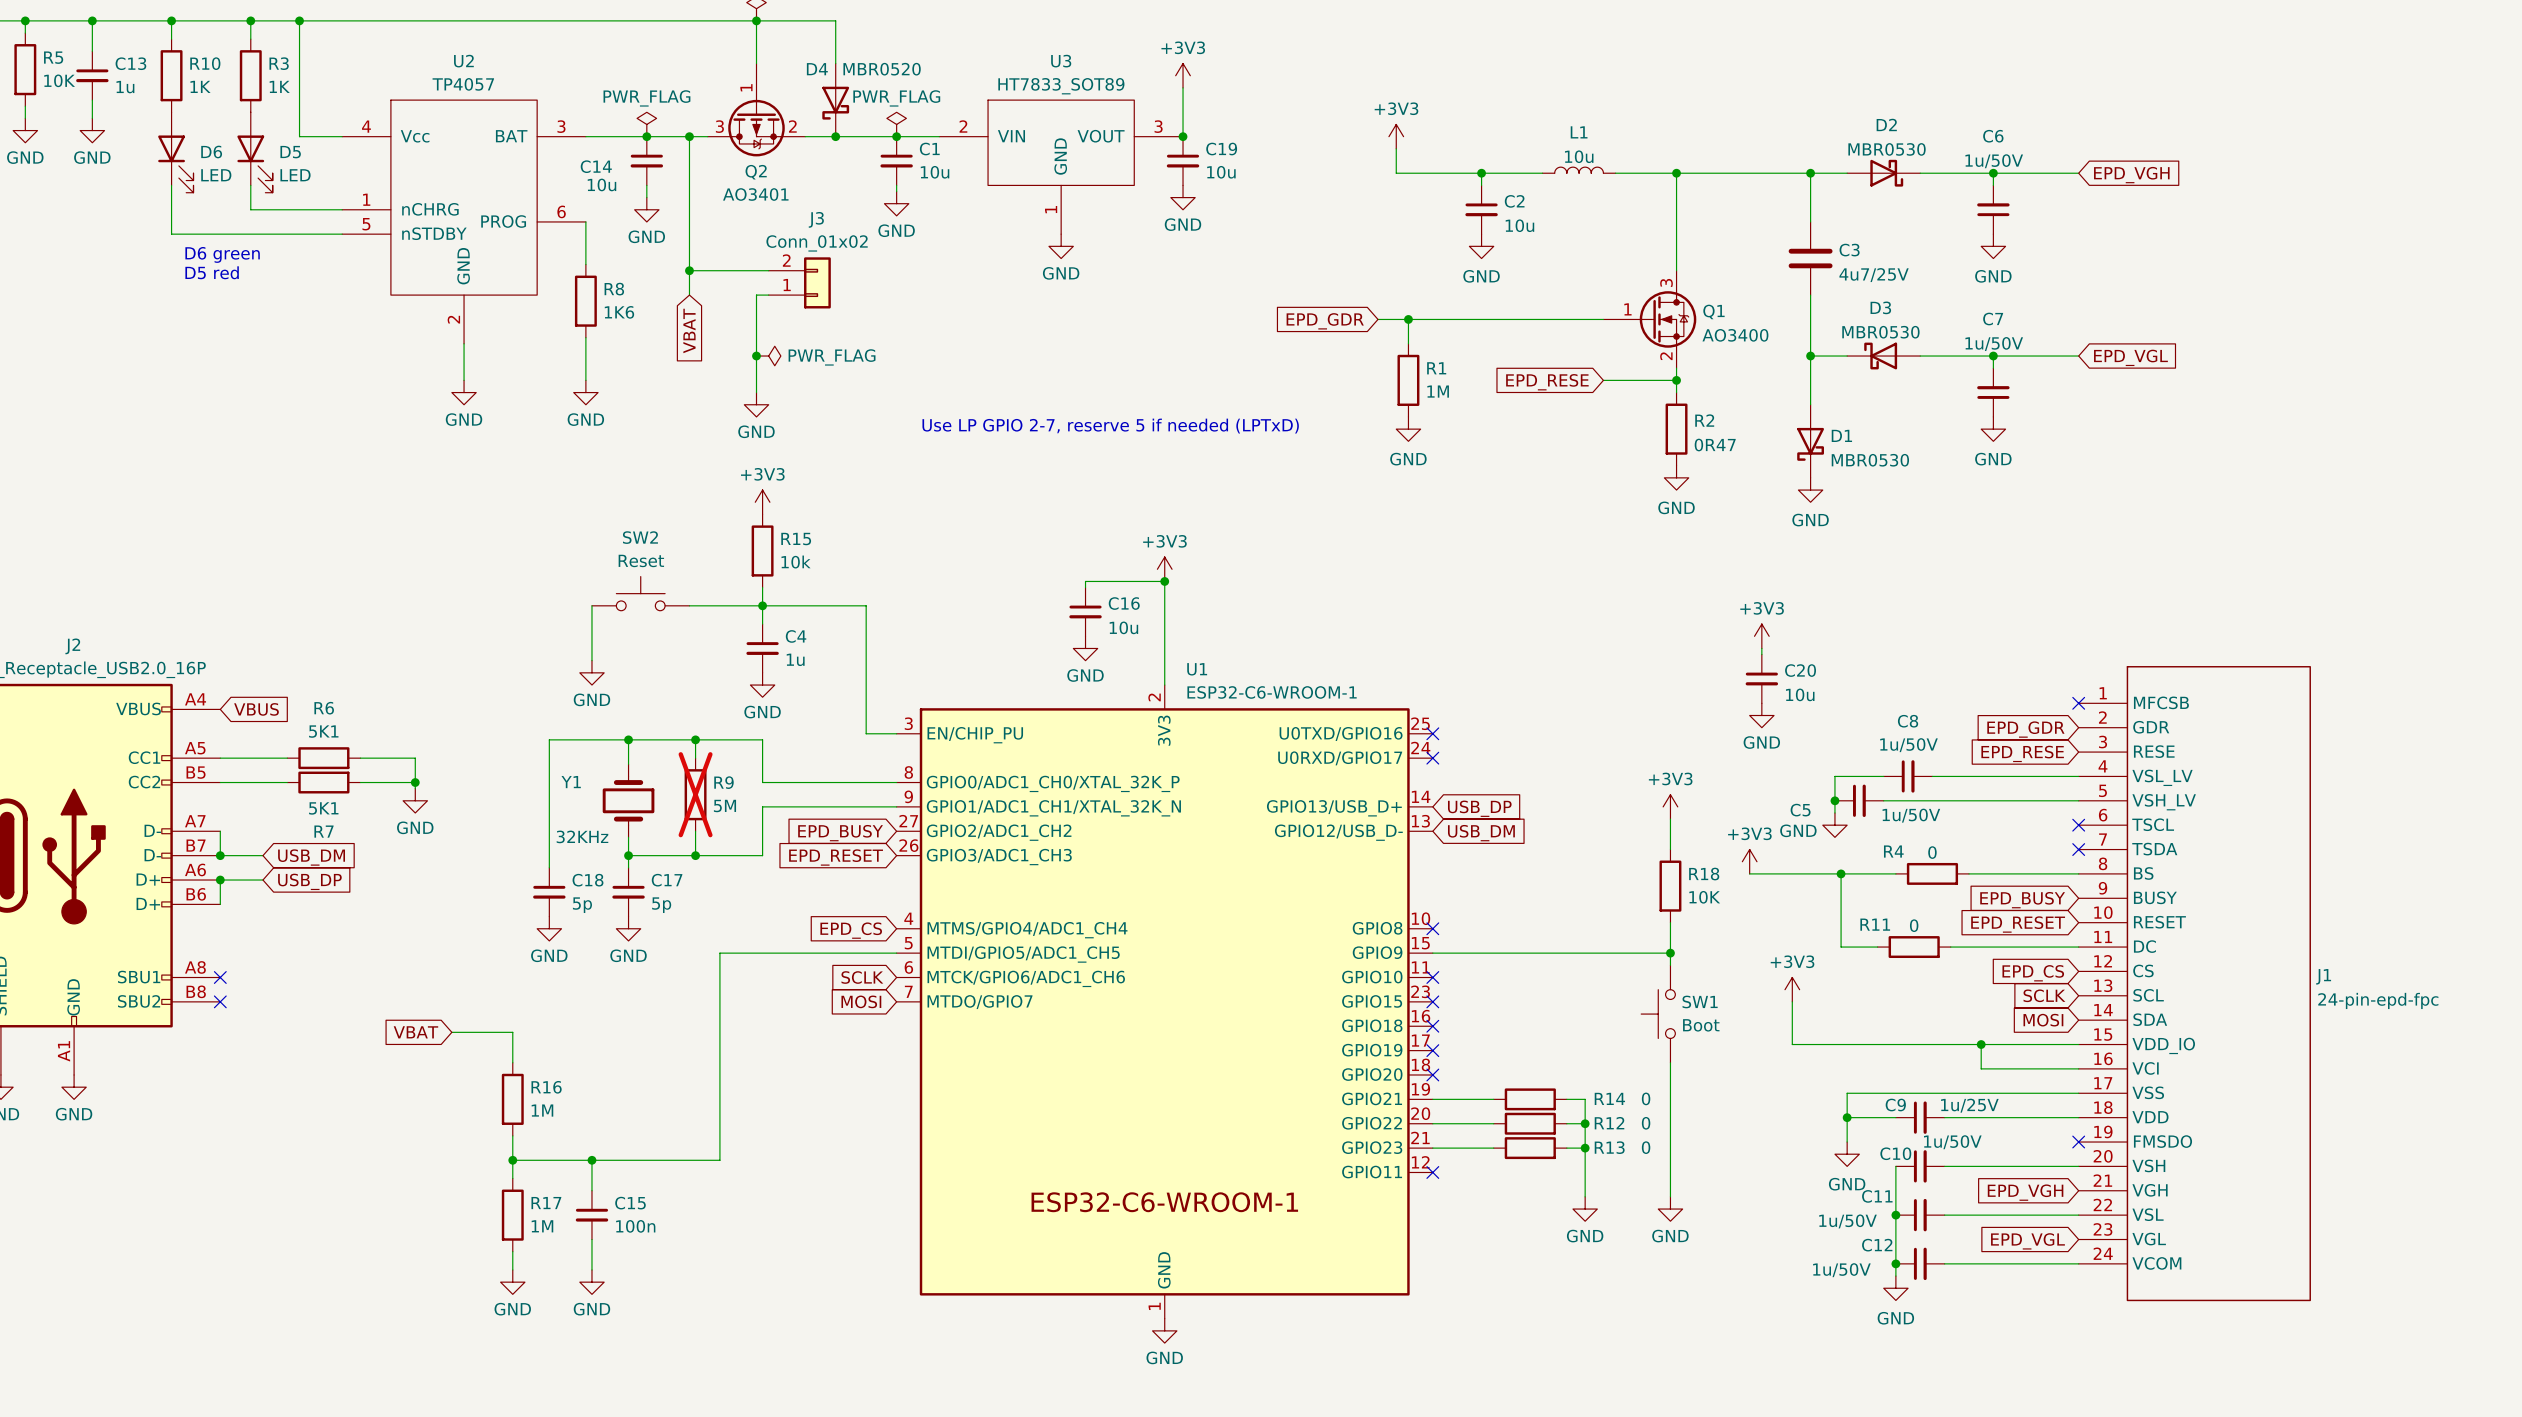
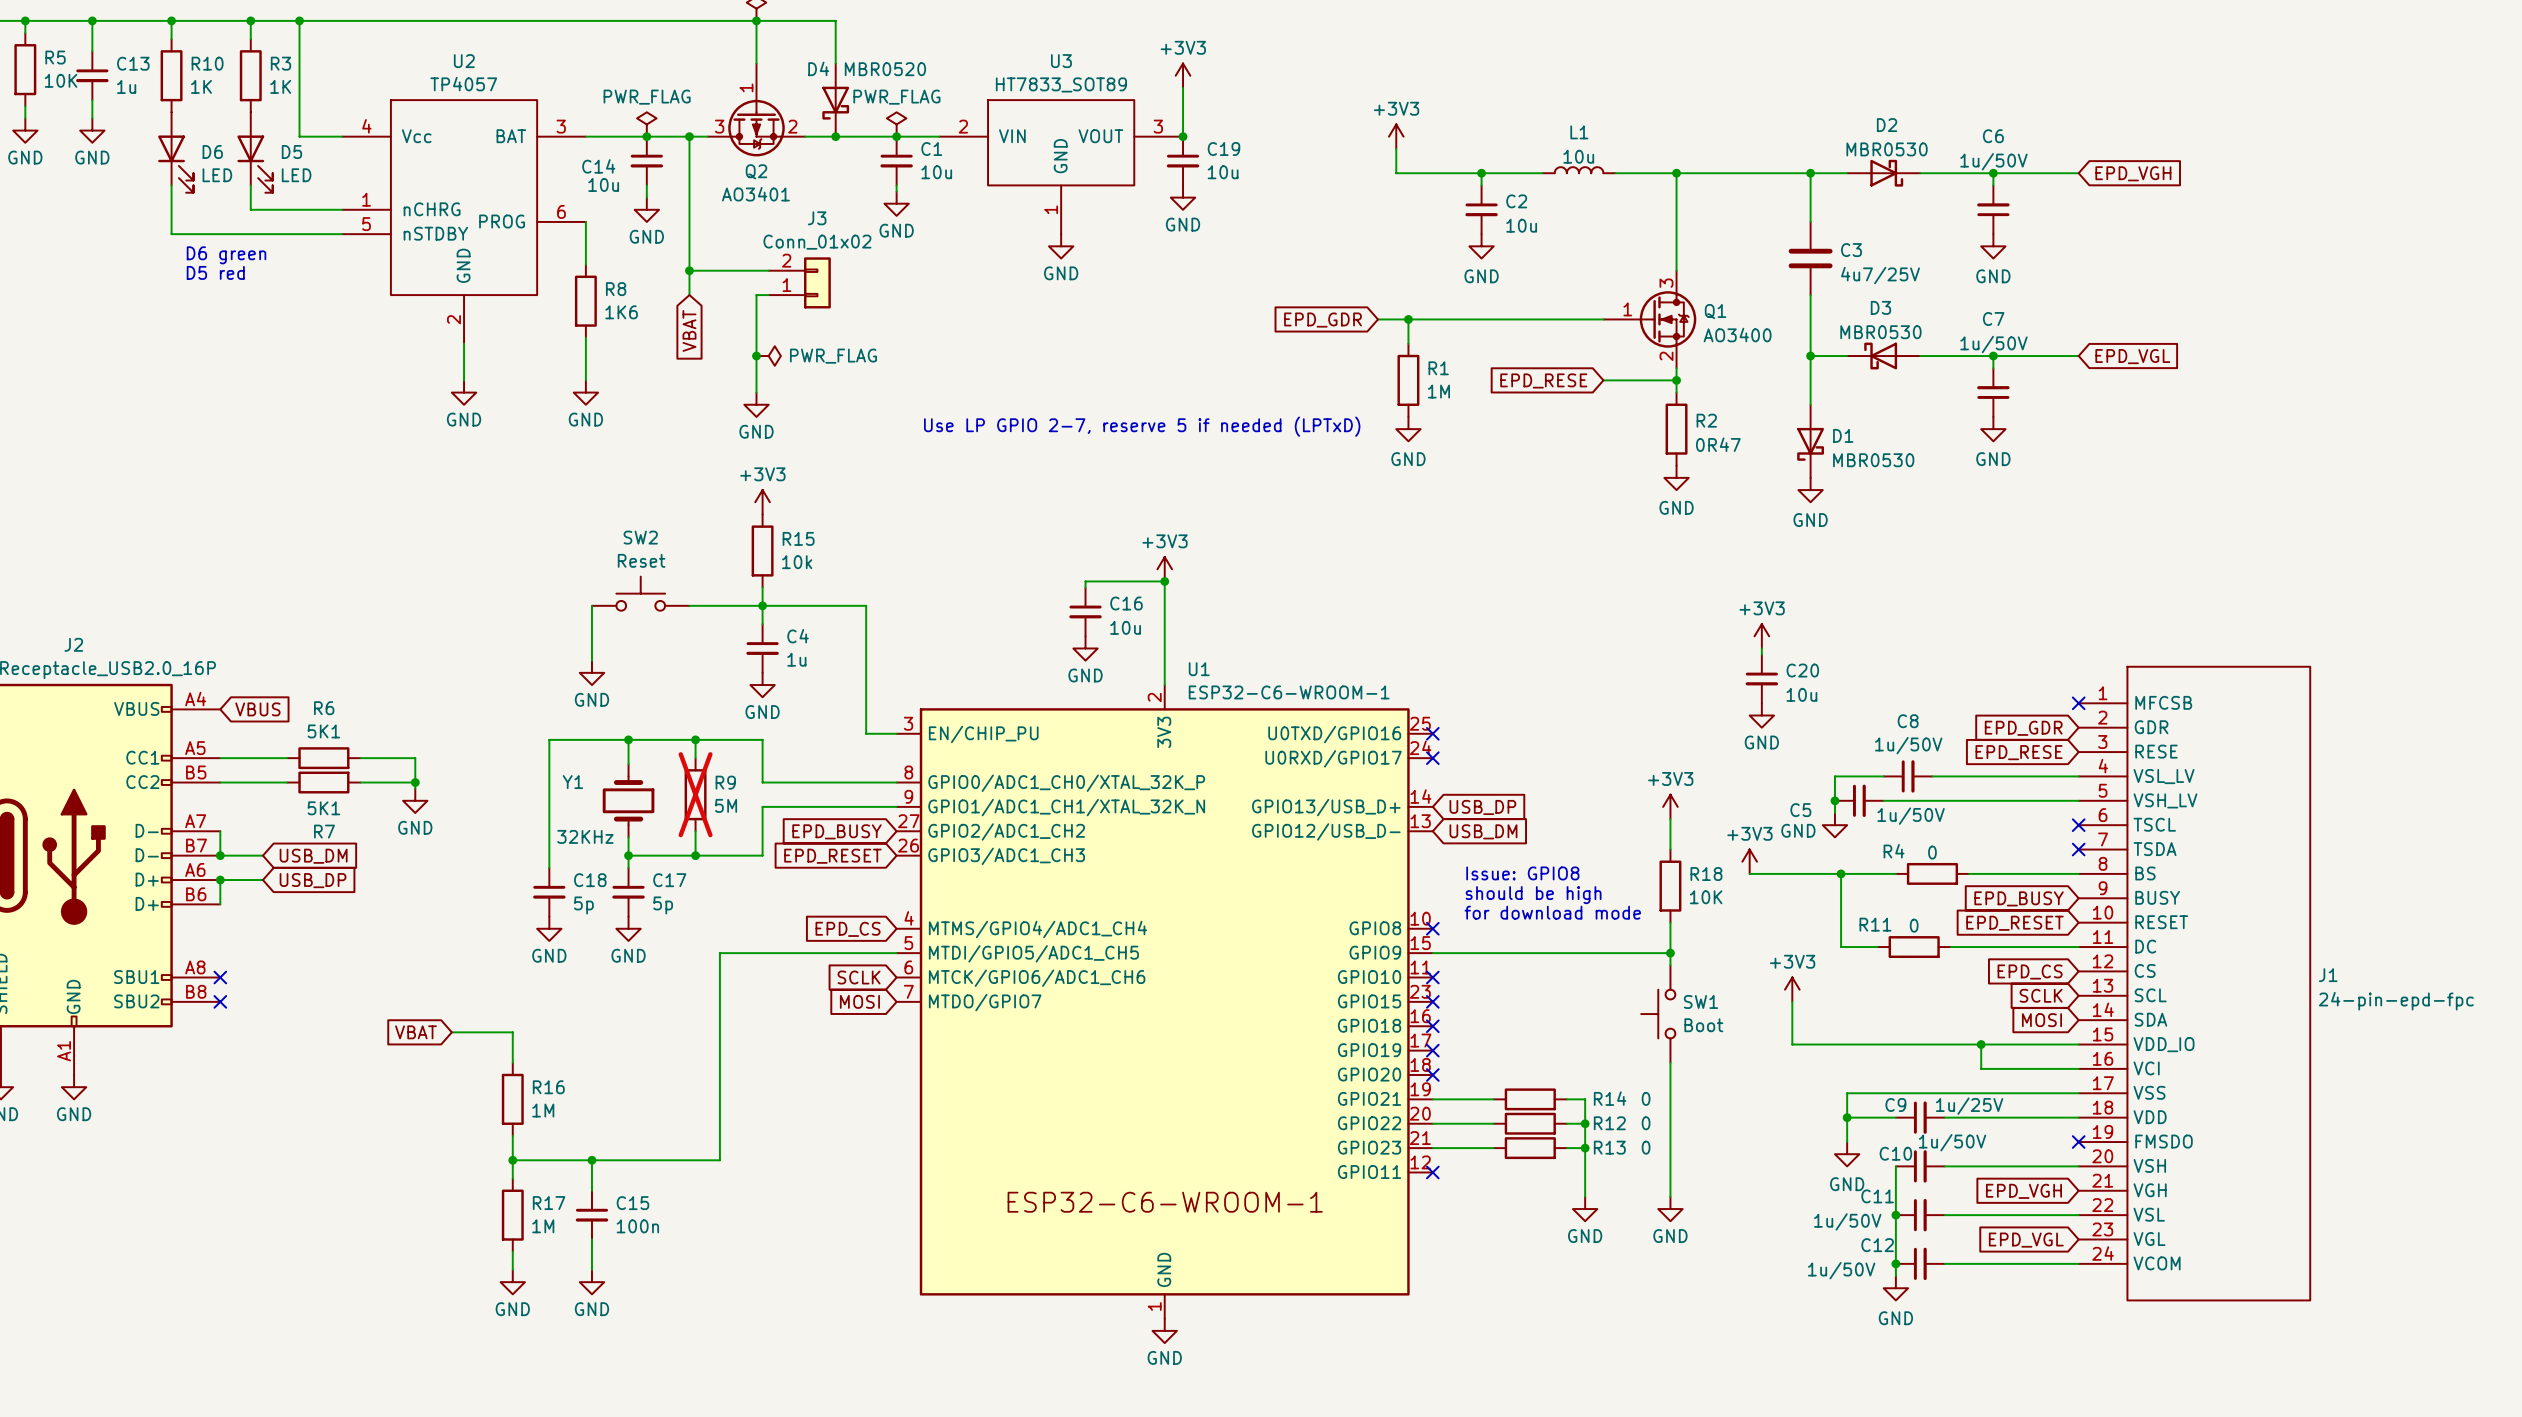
text: none -> Issue: GPIO8 (1522, 873)
text: none -> should be high (1533, 895)
text: none -> for download mode (1552, 912)

